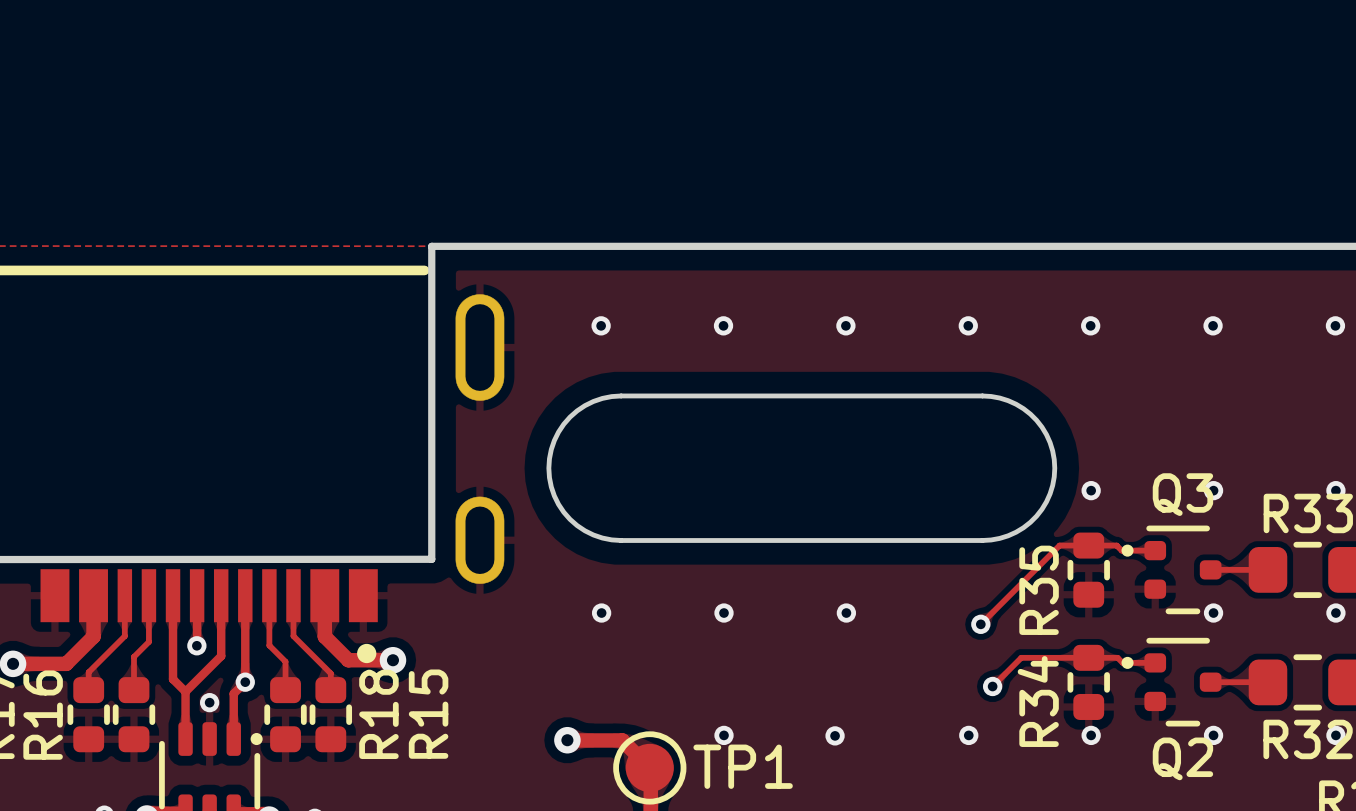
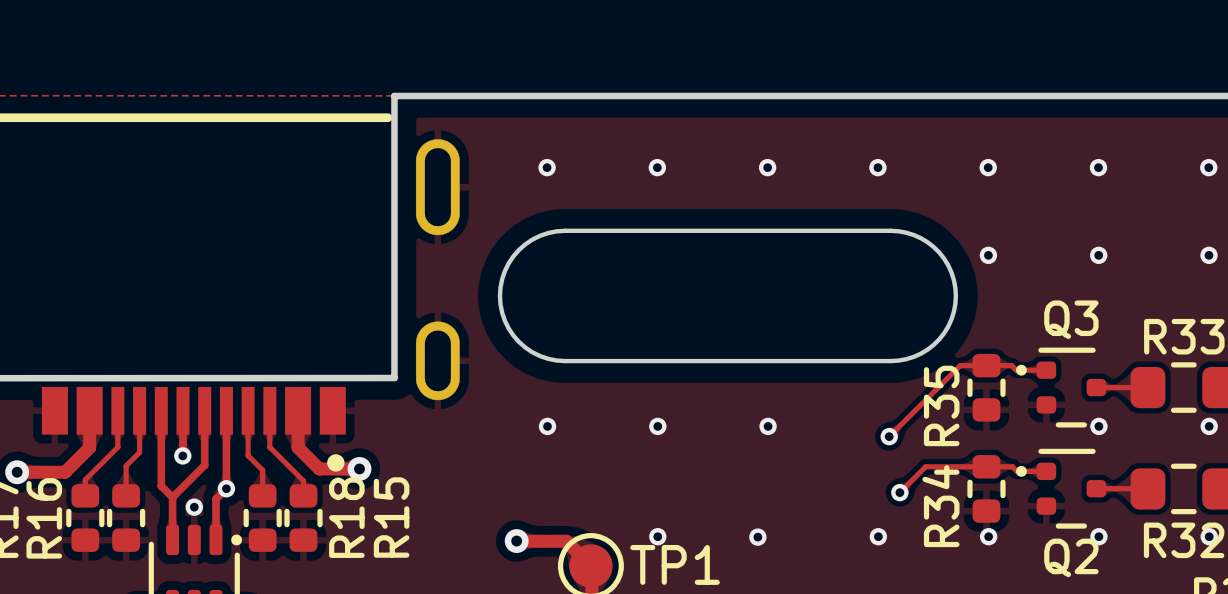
via position: (1091, 490) -> (988, 255)
via position: (1213, 490) -> (1098, 255)
via position: (1335, 490) -> (1209, 255)

